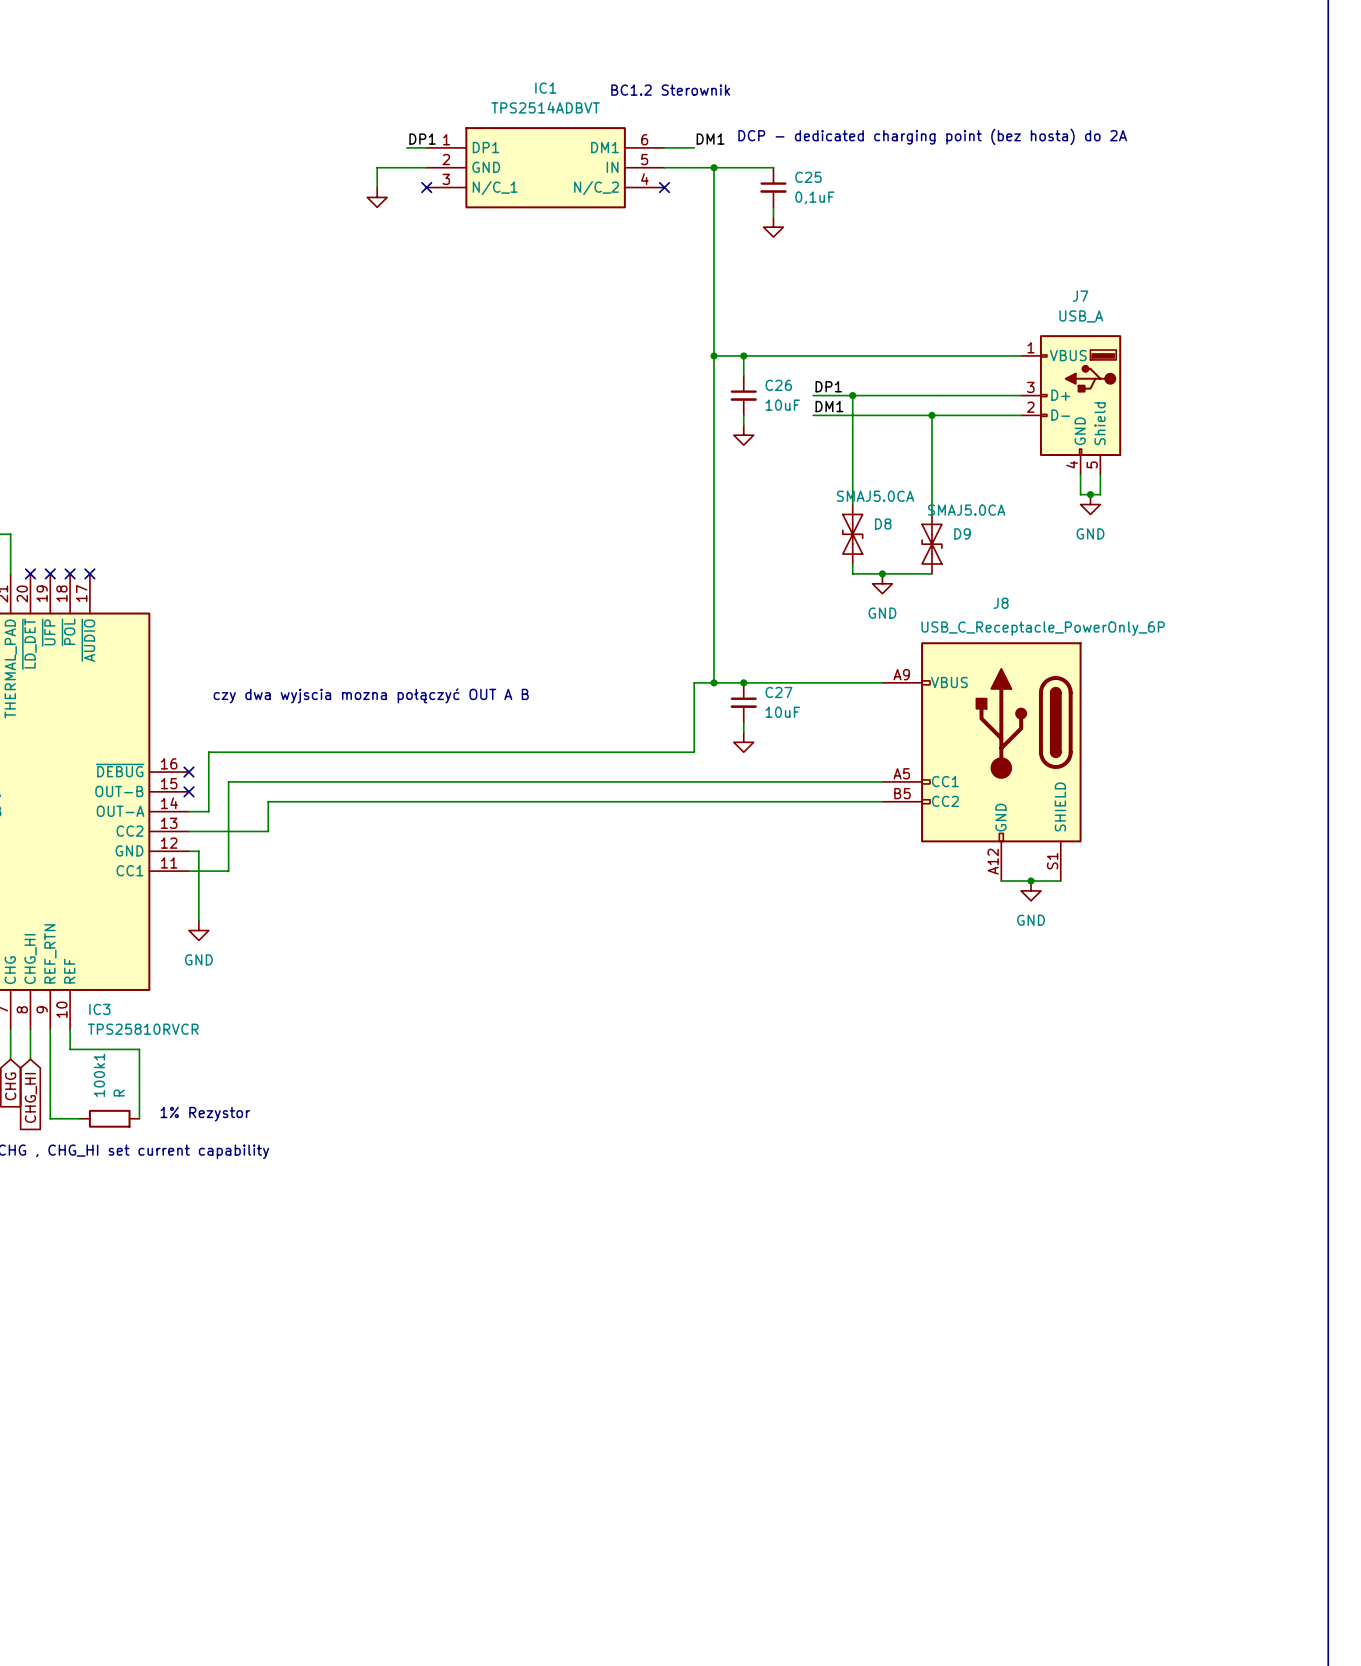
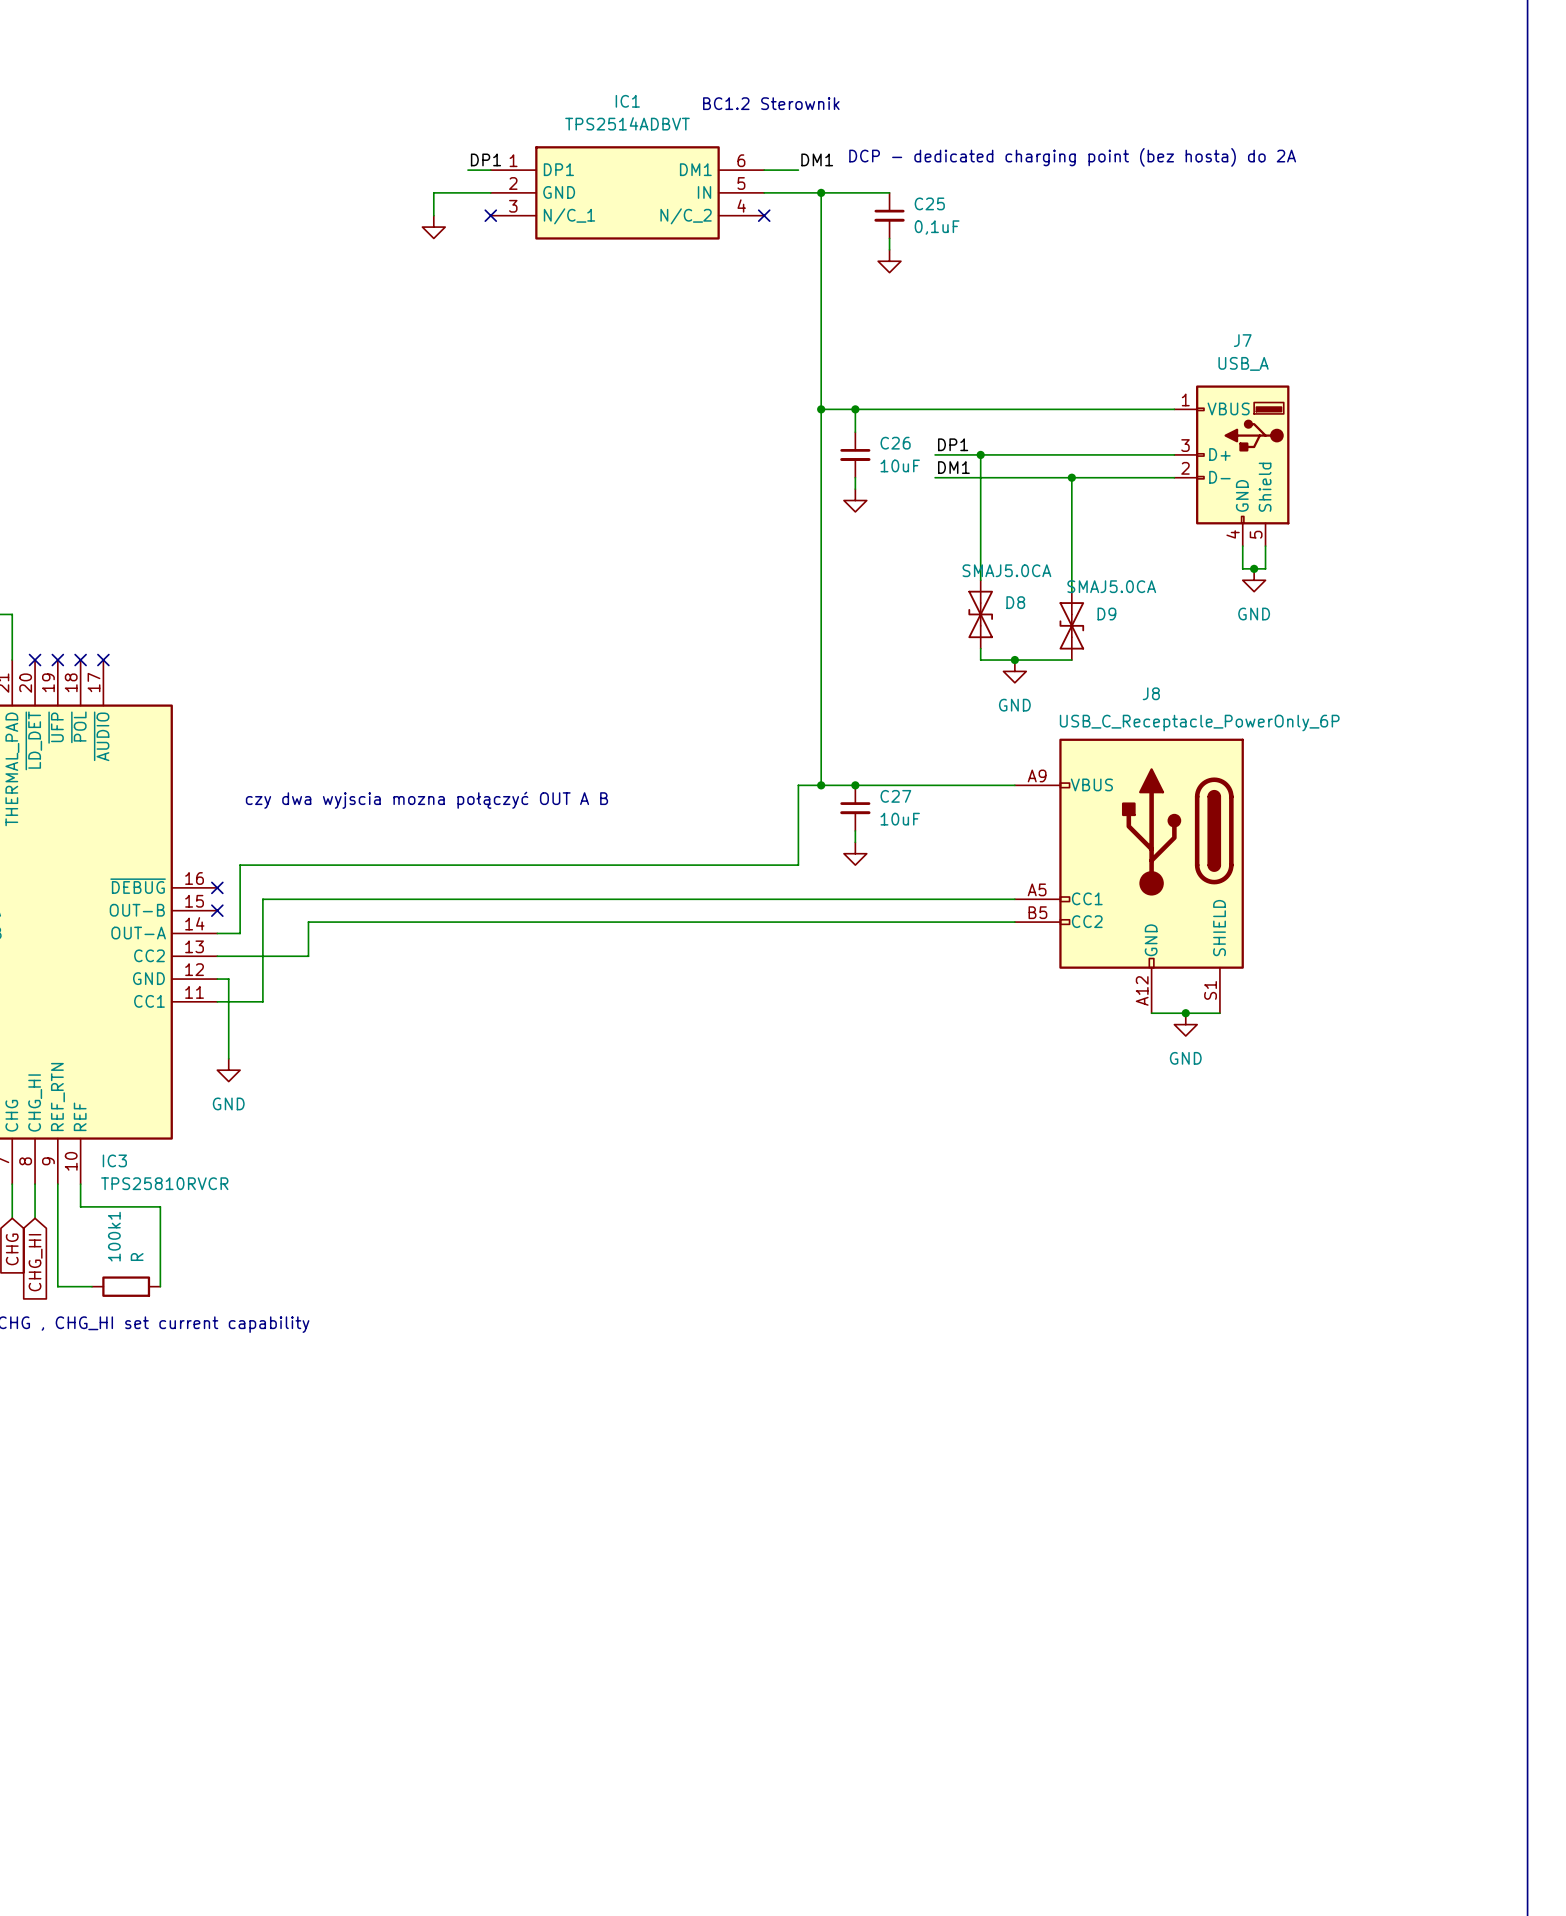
text: 1% Rezystor (205, 1114) -> none

